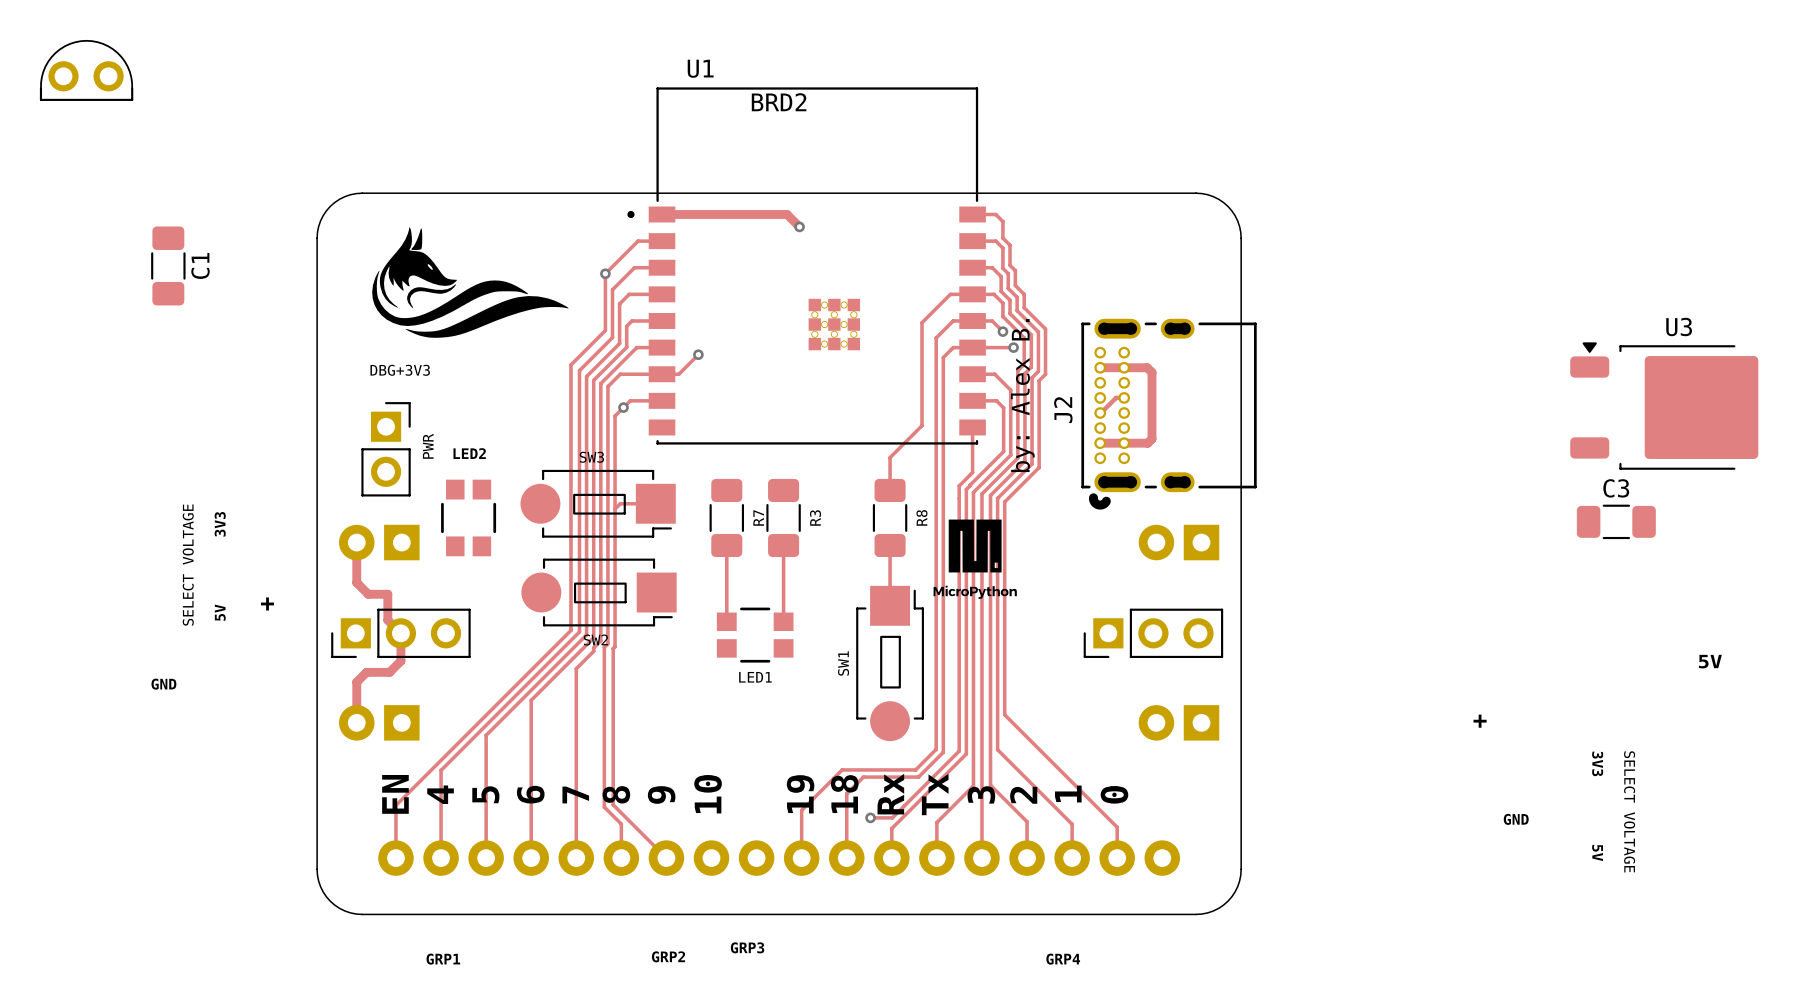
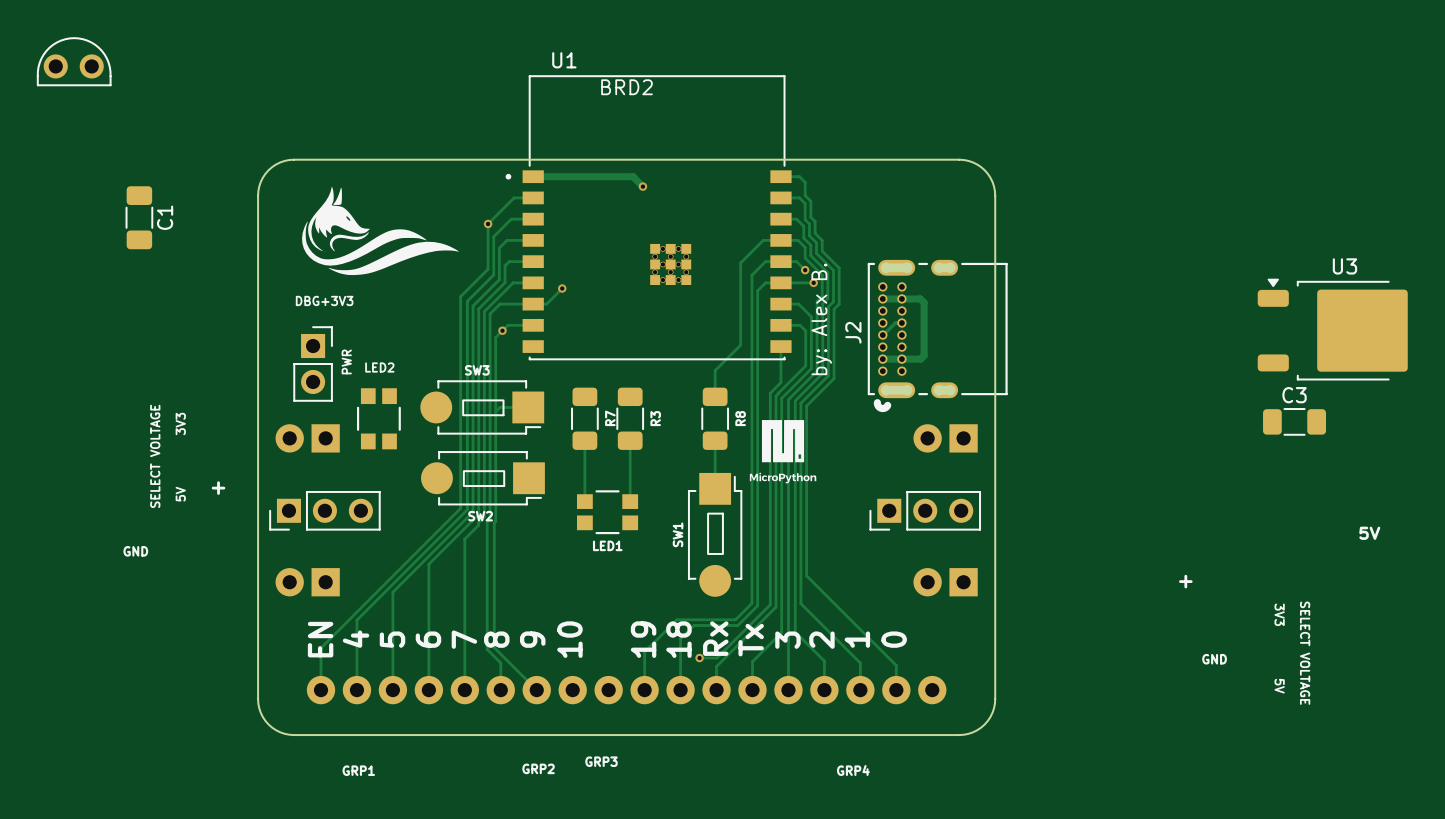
track: (356, 542) (356, 582) (368, 594) (387, 594) (387, 620) (400, 633) (400, 661) (389, 672) (366, 672) (356, 682) (356, 722) -> none

